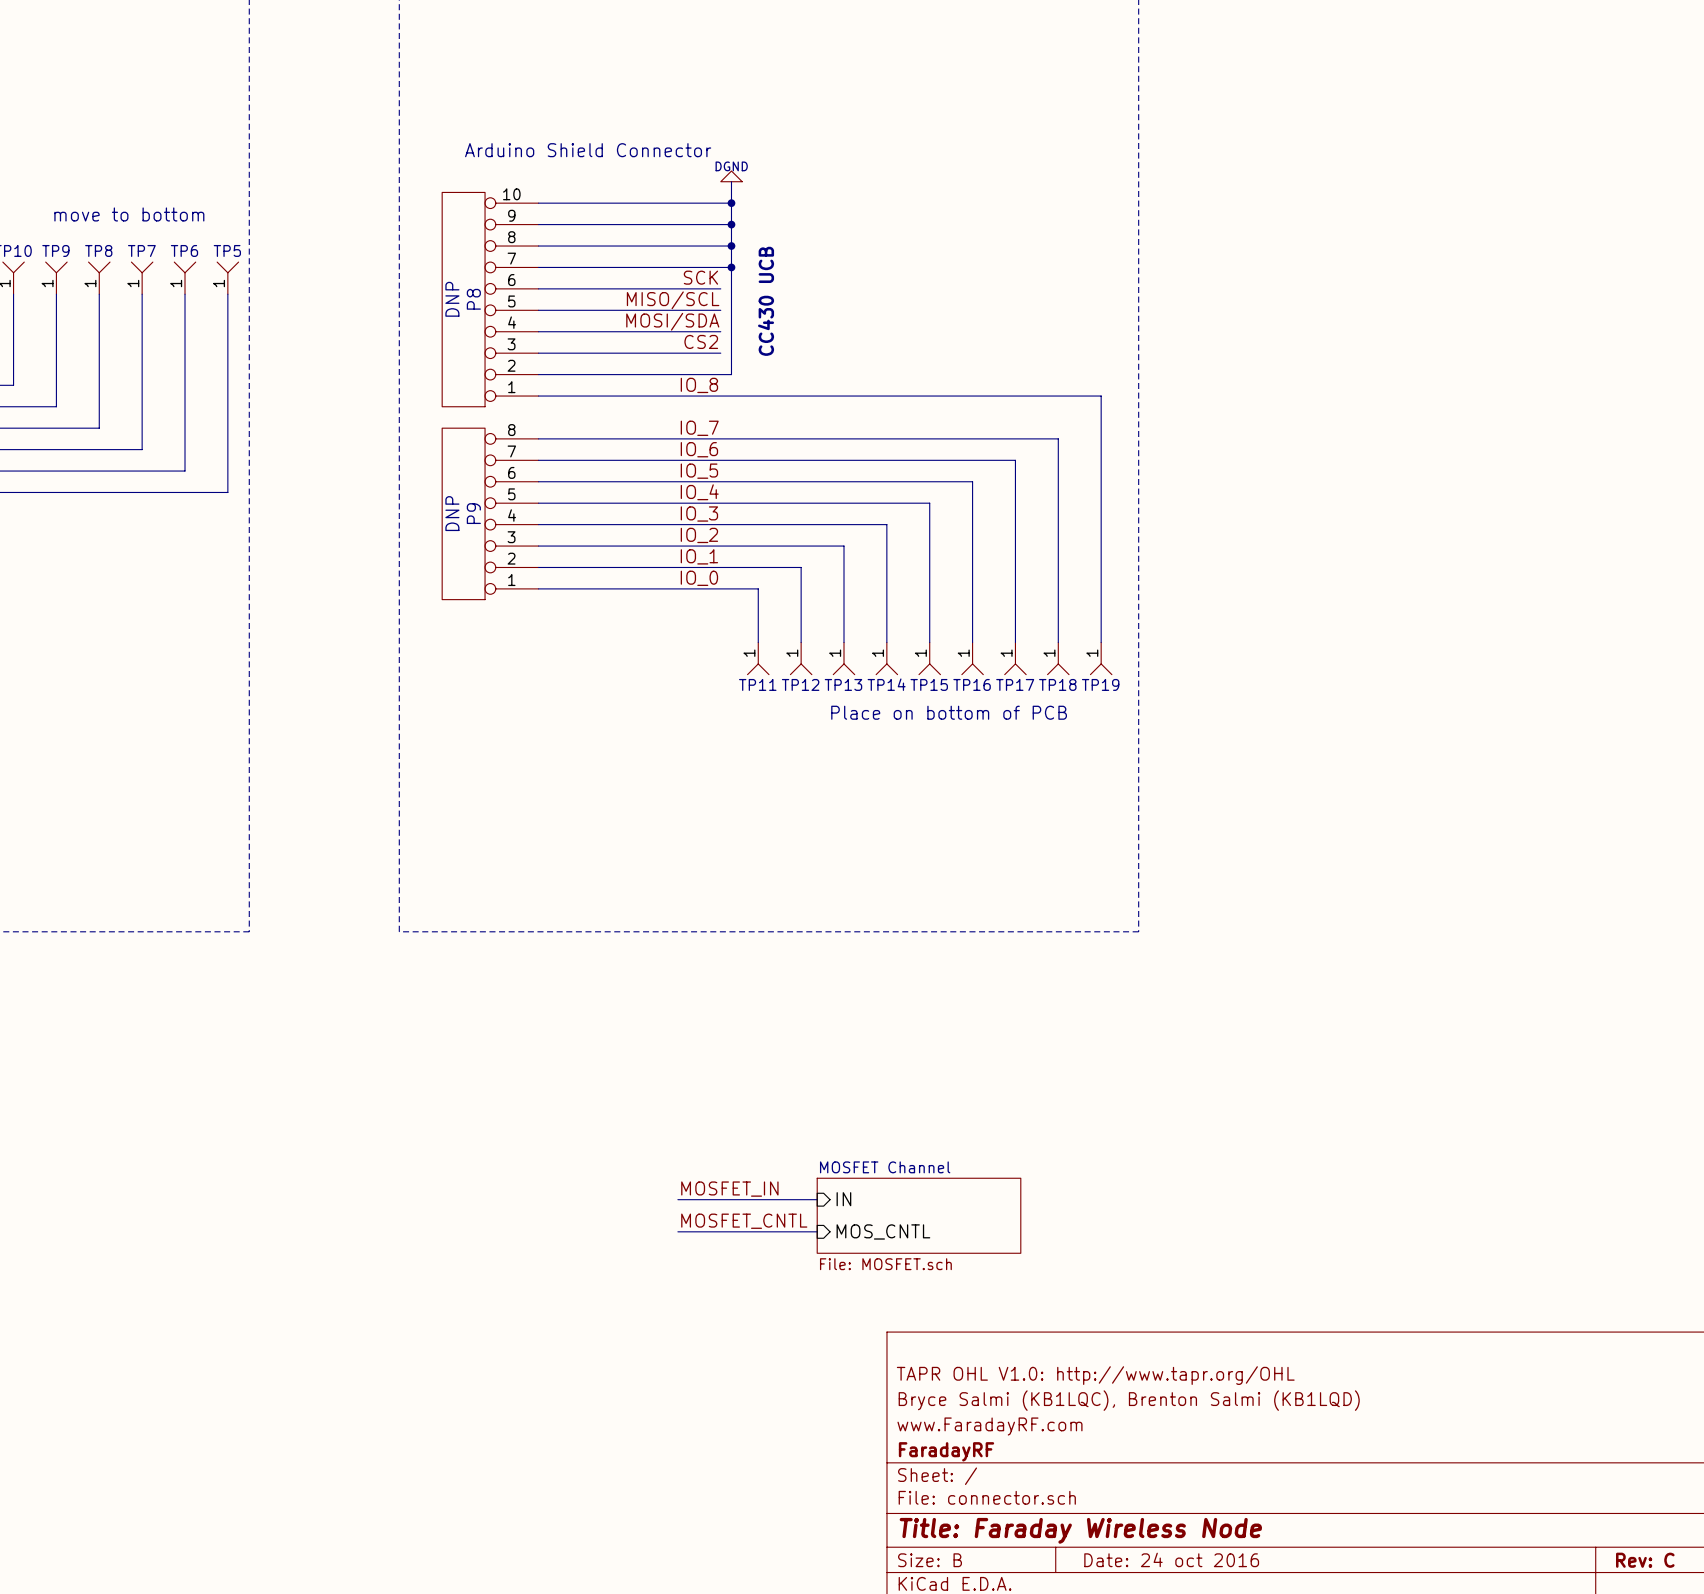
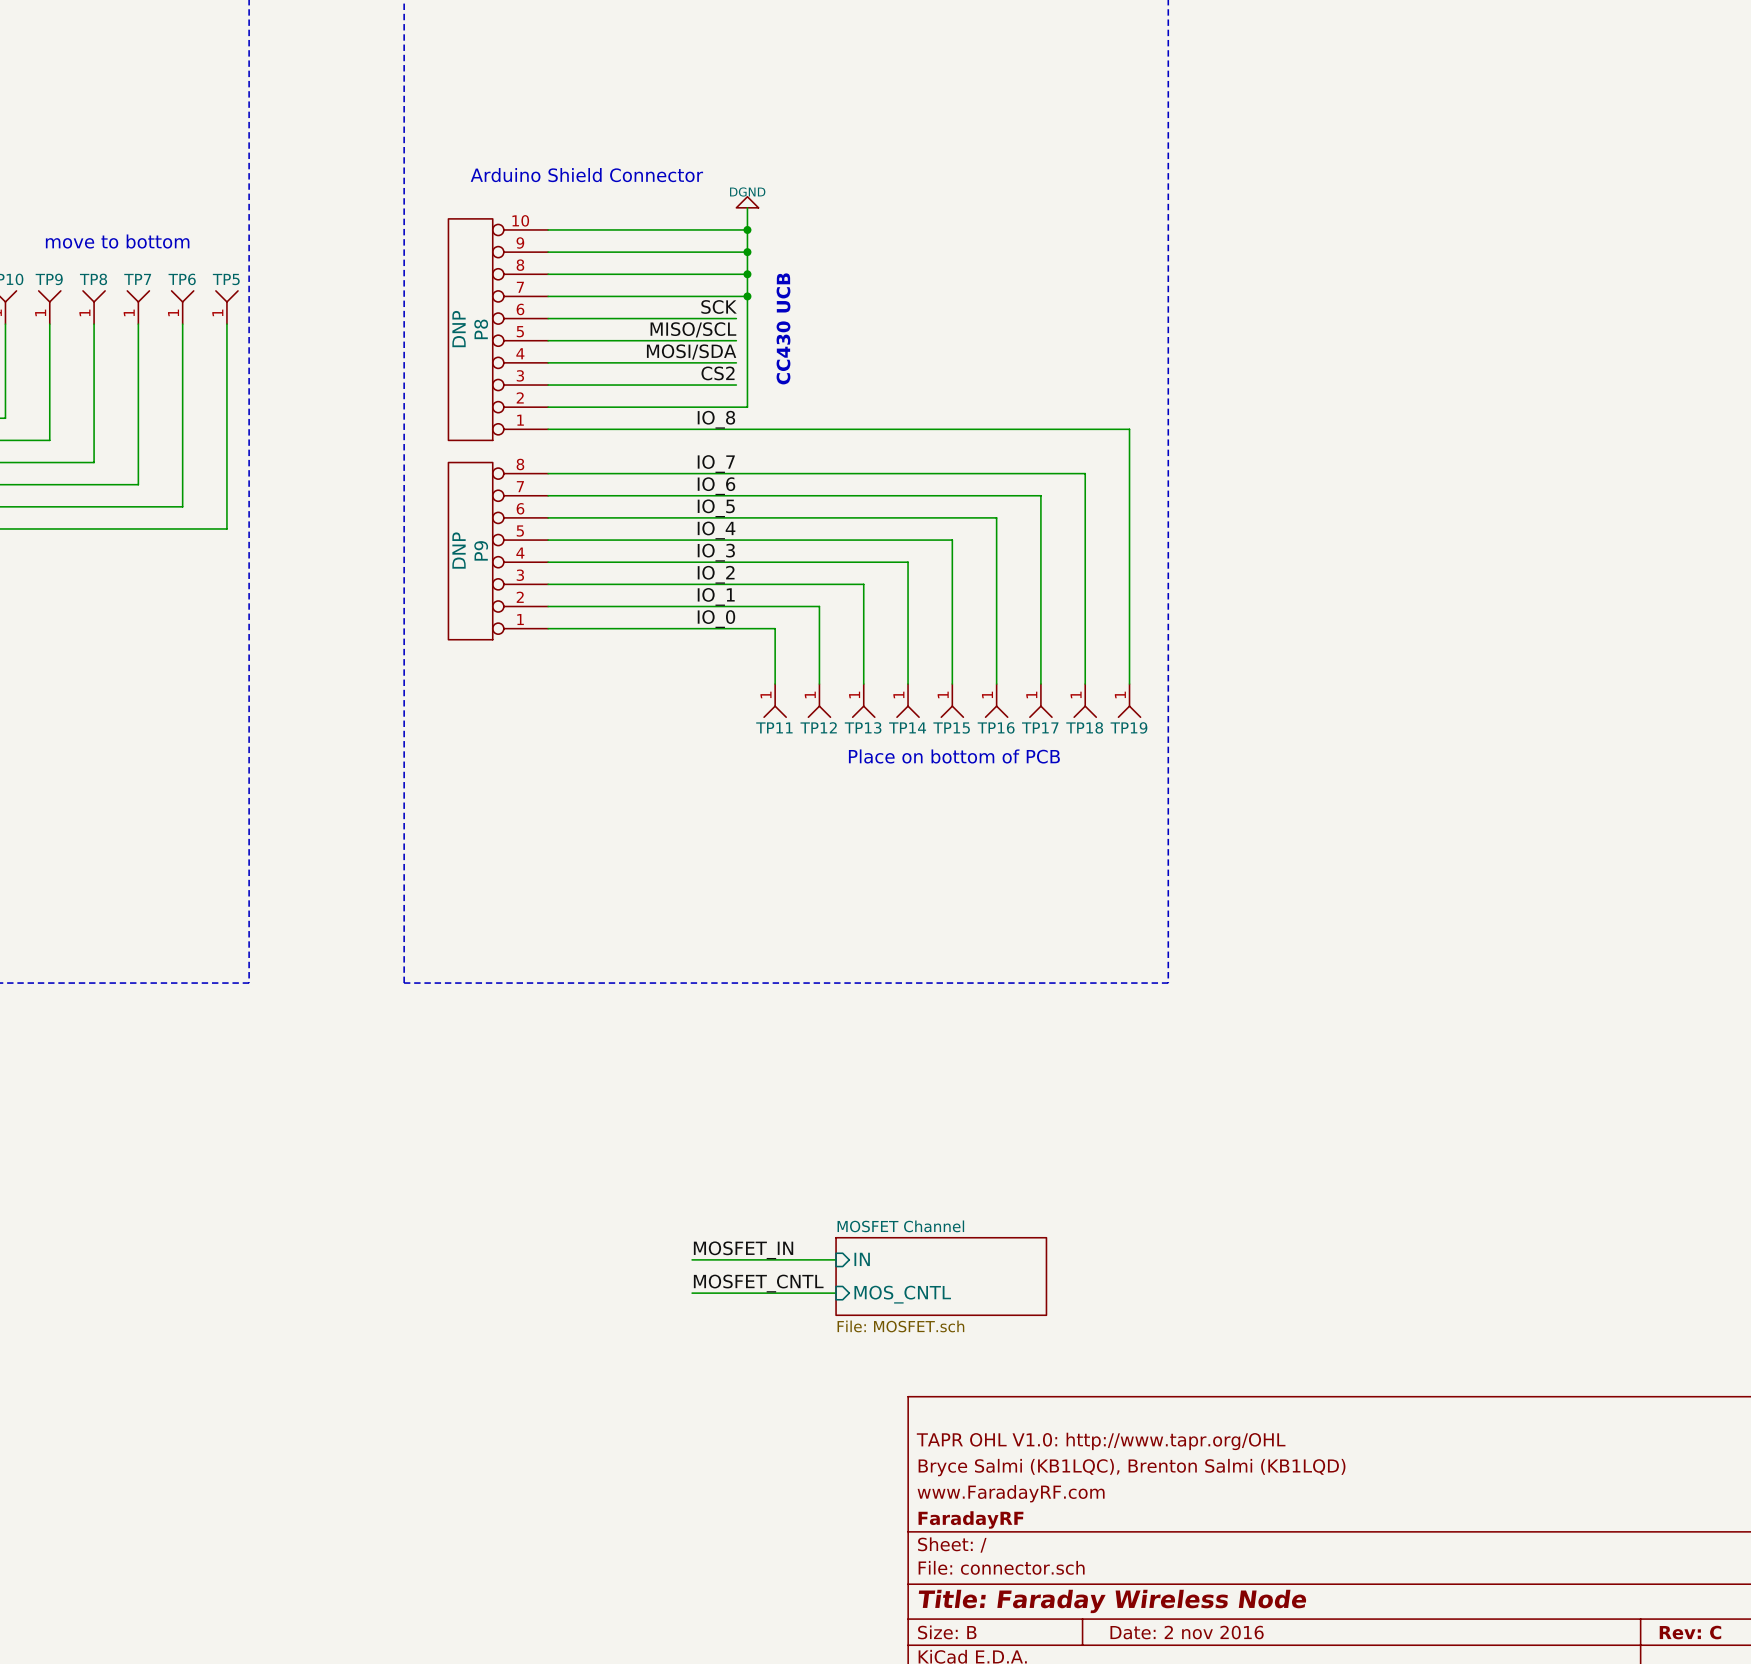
title block: Date: 24 oct 2016 (1171, 1559) -> Date: 2 nov 2016 (1187, 1632)

